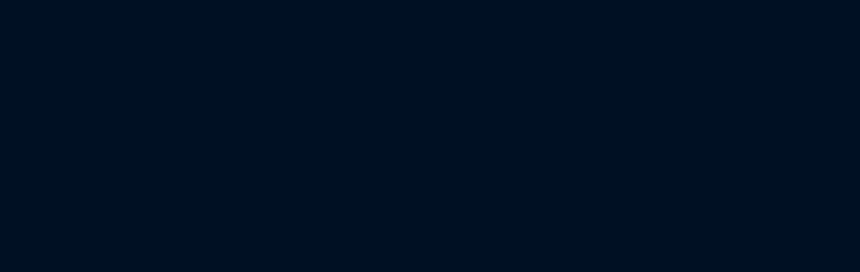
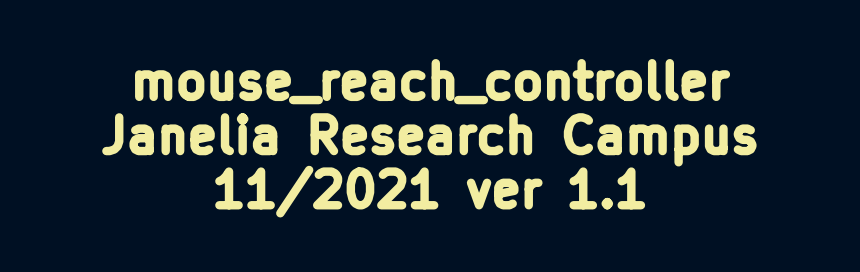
text: none -> mouse_reach_controller (432, 81)
text: none -> Janelia Research Campus (429, 139)
text: none -> 11/2021 ver 1.1 (430, 191)

